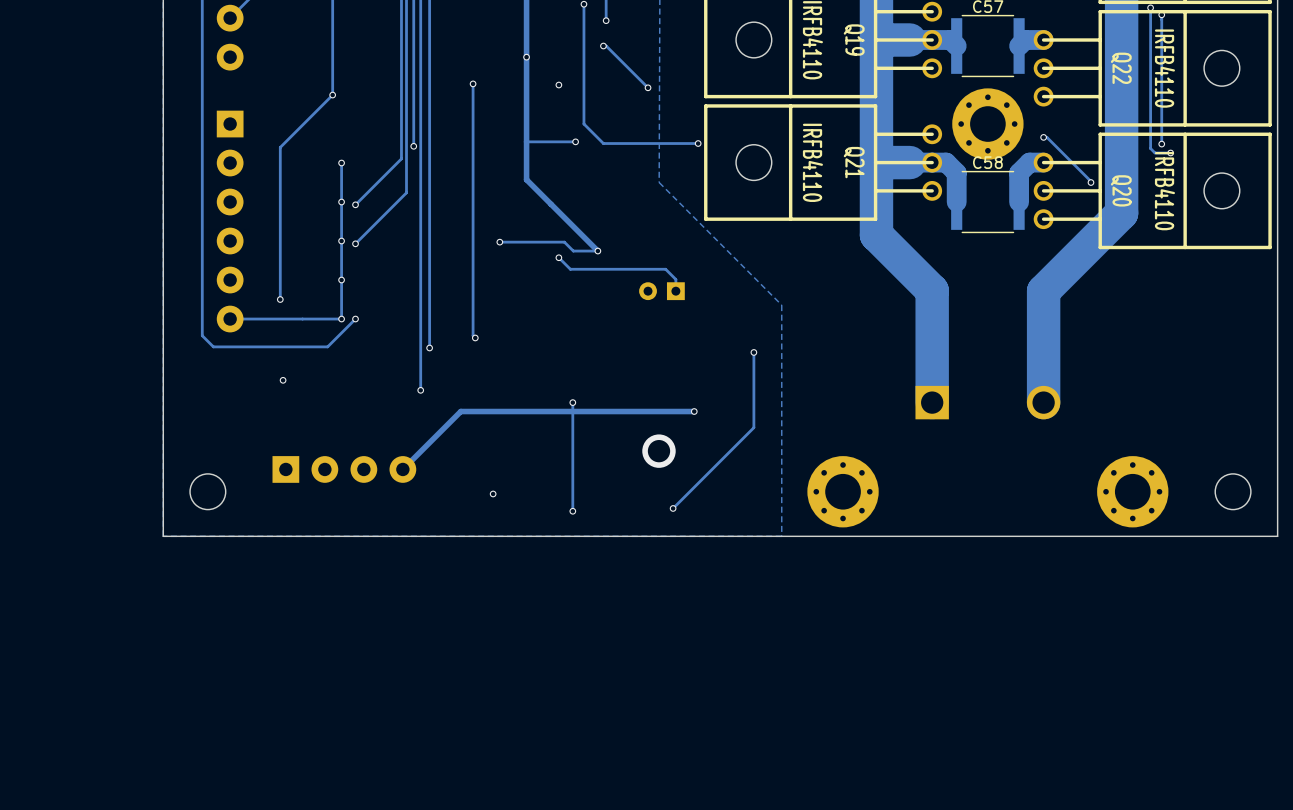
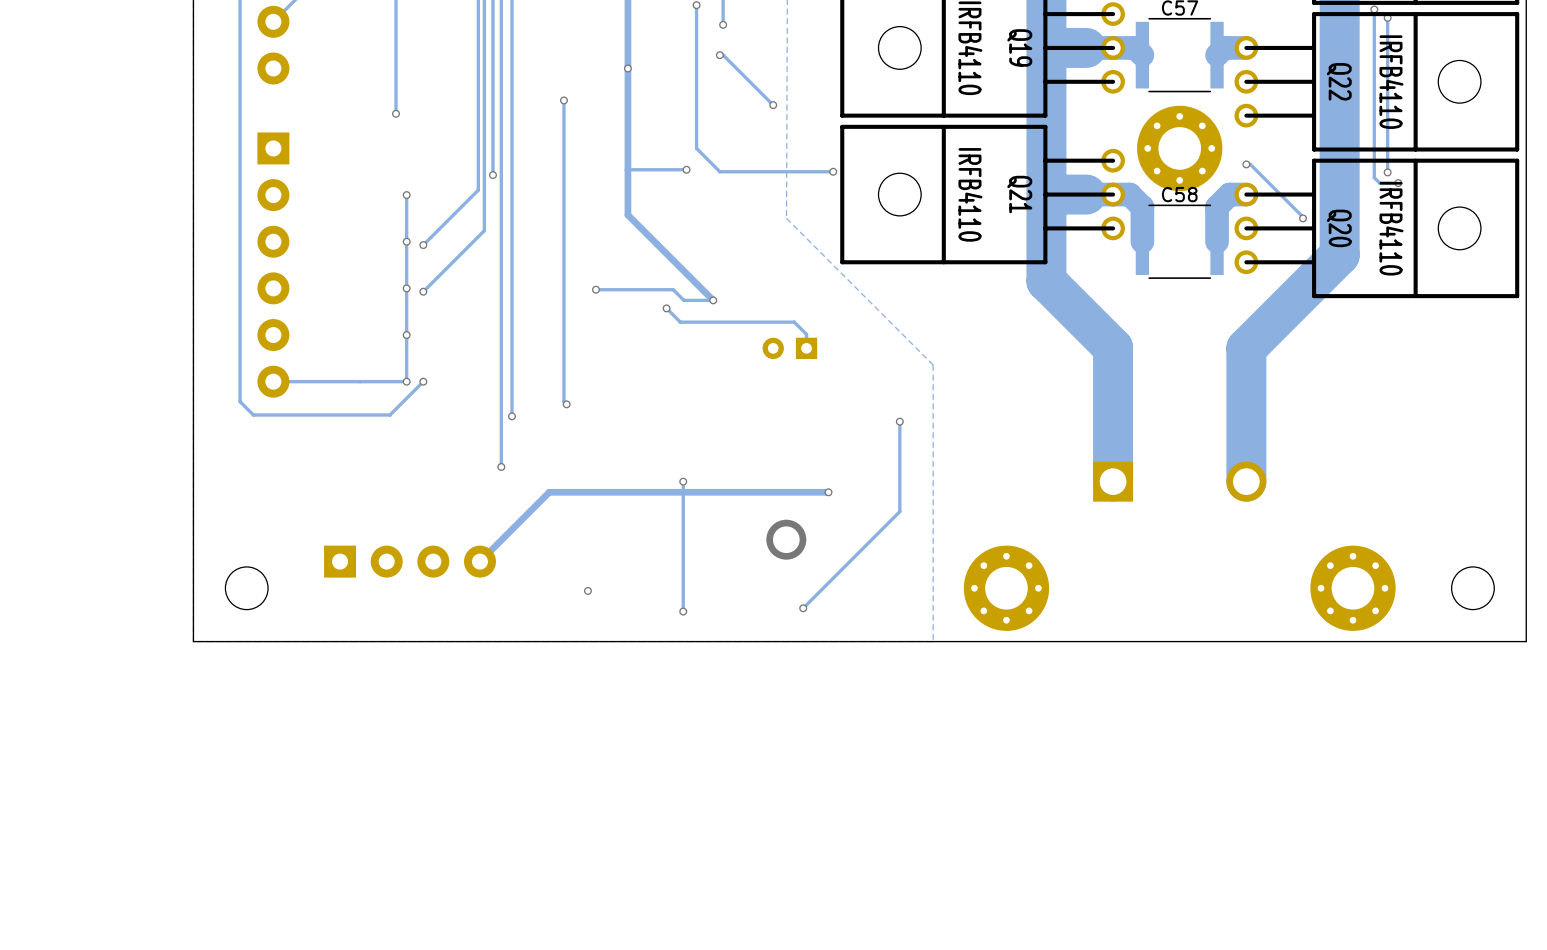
via: (558, 85) -> none
track: (332, 95) (280, 147) (280, 299) -> none
via: (280, 299) -> none
via: (283, 380) -> none

